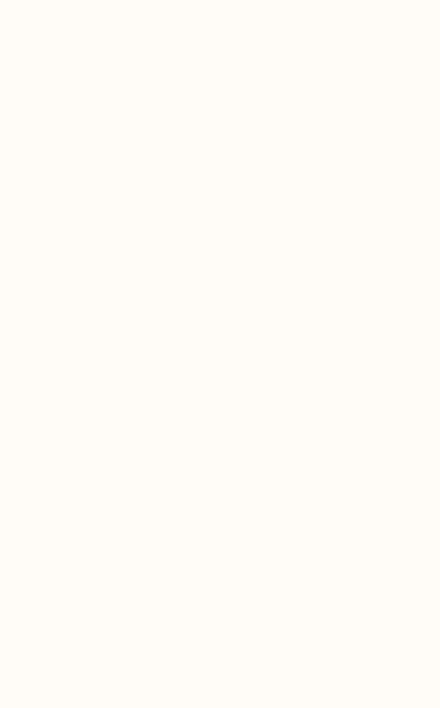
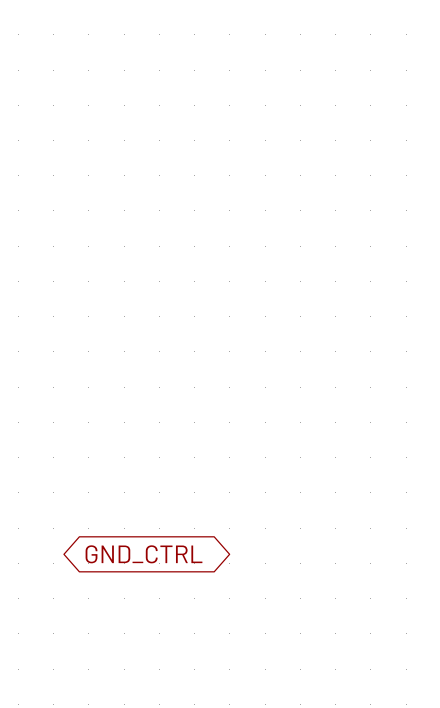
global label: none -> GND_CTRL (144, 554)

